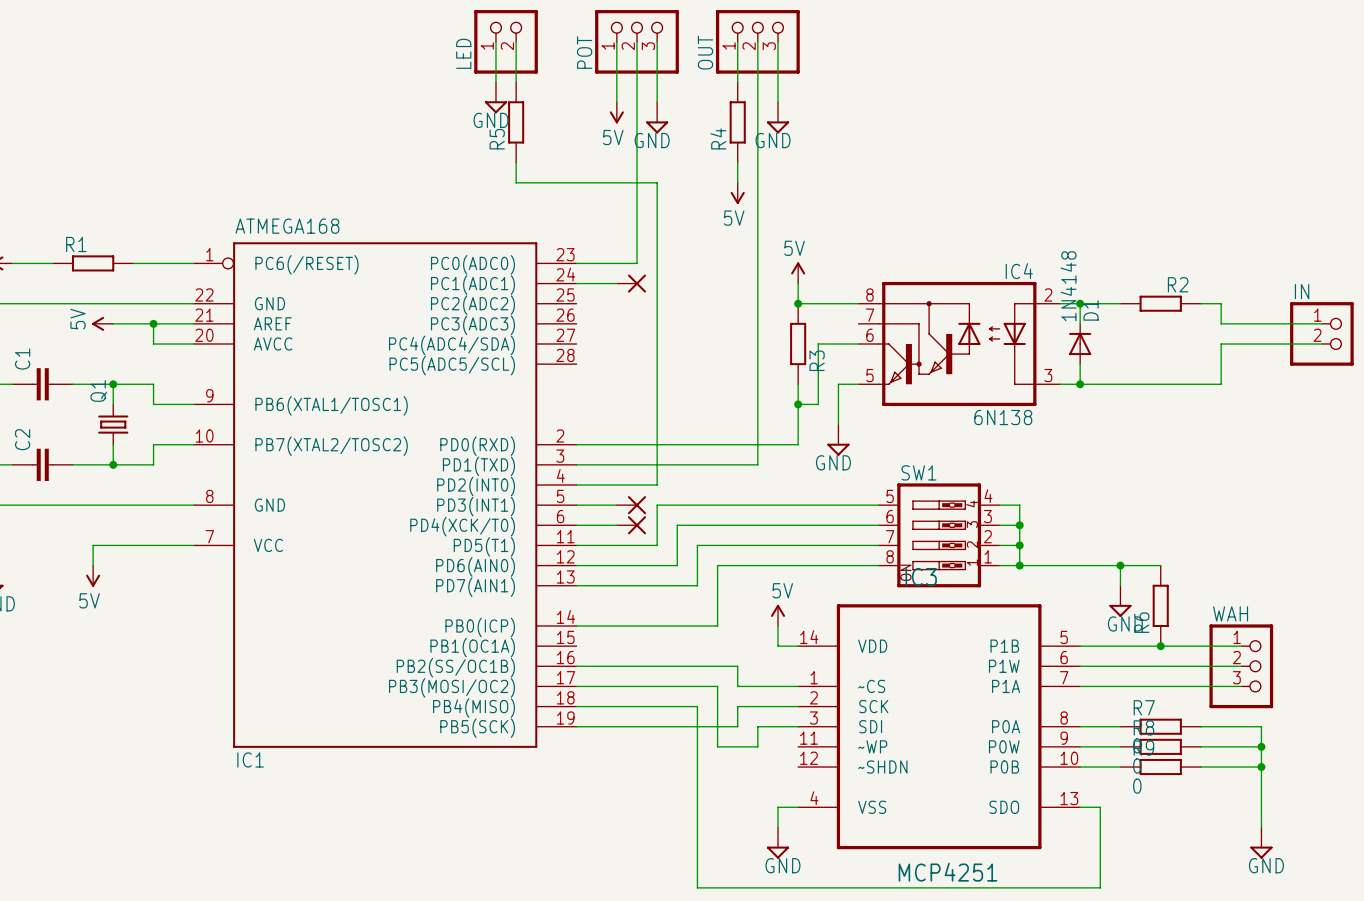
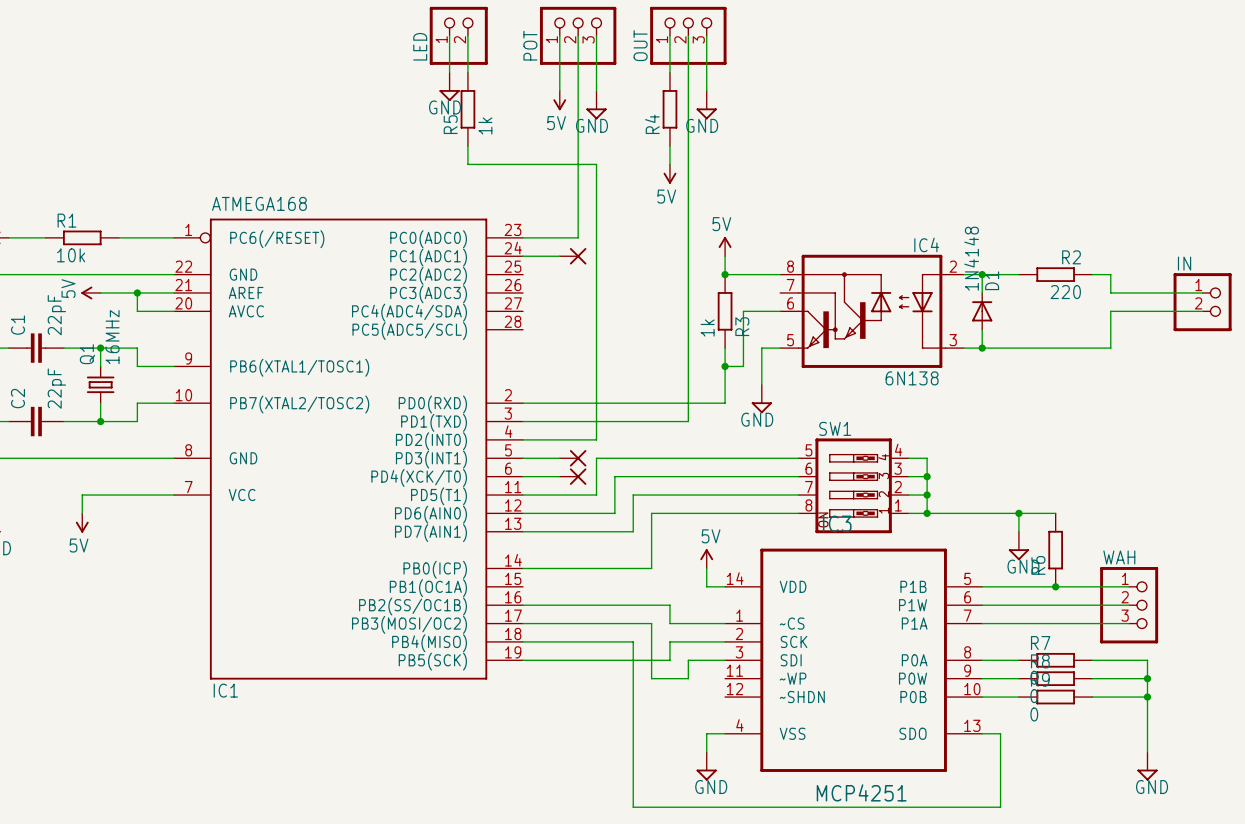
R5 value: none -> 1k (485, 126)
R1 value: none -> 10k (71, 255)
R2 value: none -> 220 (1065, 292)
C1 value: none -> 22pF (56, 315)
R3 value: none -> 1k (707, 328)
Q1 value: none -> 16MHz (112, 337)
C2 value: none -> 22pF (56, 388)

